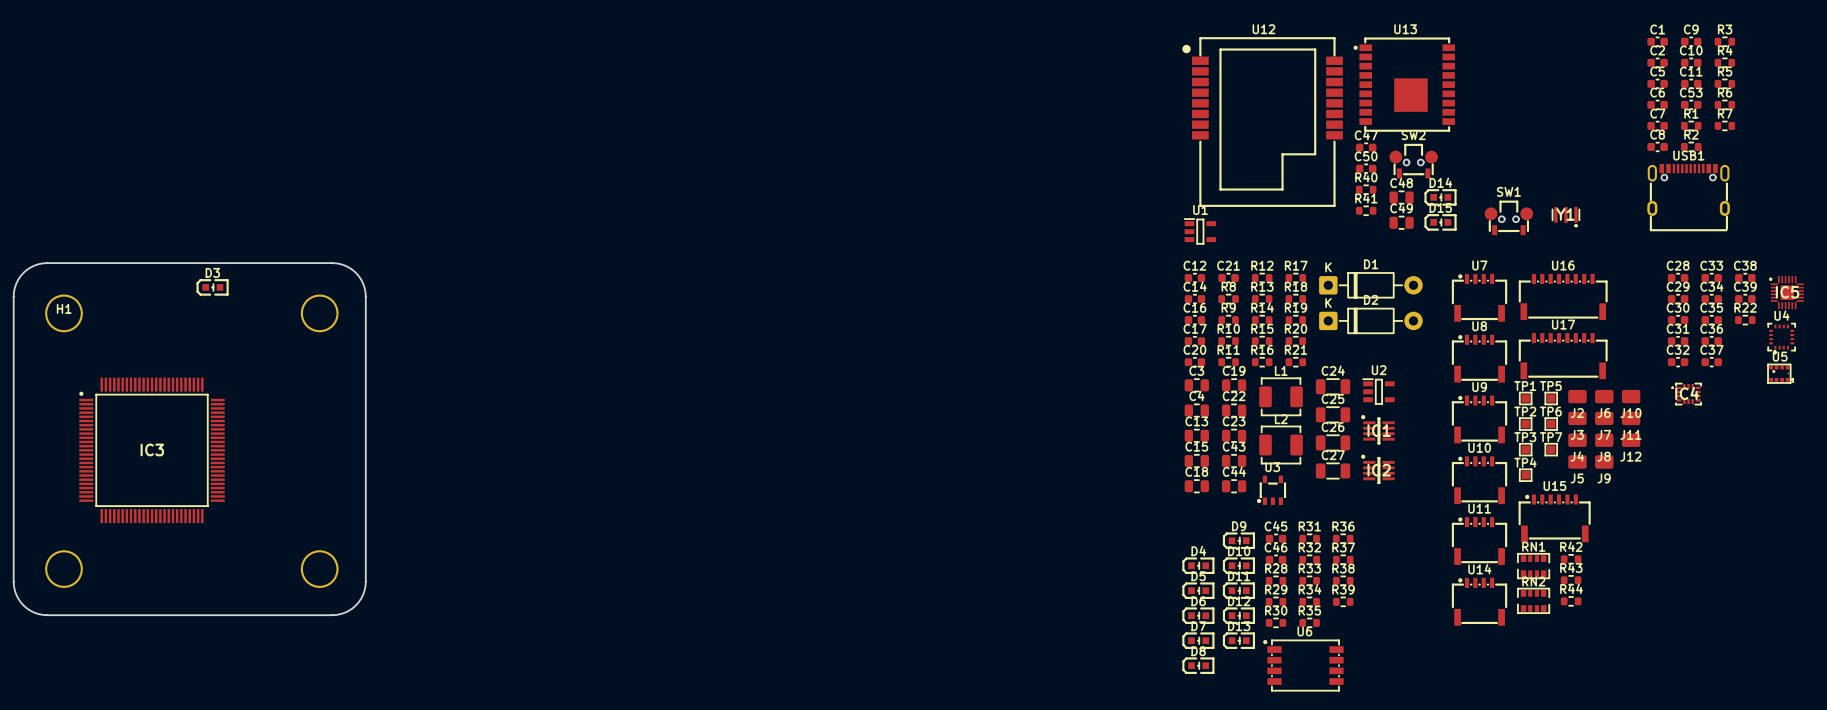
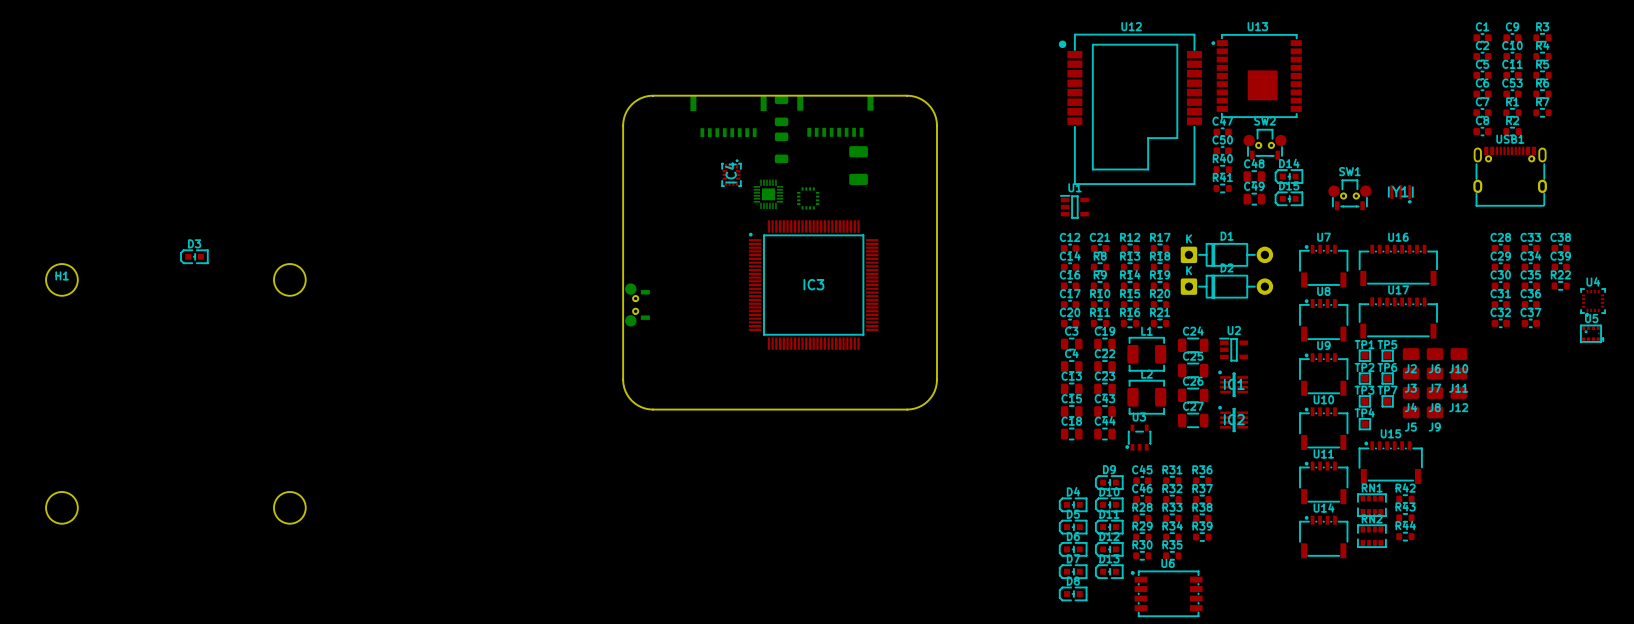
board edge: none -> (653, 95) (907, 95) (918, 97) (928, 104) (934, 114) (937, 125) (937, 379) (934, 391) (928, 400) (918, 407) (907, 409) (653, 409) (641, 407) (631, 400) (625, 391) (623, 379) (623, 121) (627, 110) (631, 104) (641, 97) (653, 95)
part: none -> (781, 110)
part: none -> (835, 116)
part: none -> (728, 116)
part: none -> (781, 147)
part: none -> (858, 165)
part: none -> (768, 194)
part: none -> (808, 198)
board edge: (47, 263) (332, 263) (345, 265) (355, 272) (363, 283) (365, 296) (365, 581) (363, 594) (355, 605) (345, 612) (332, 615) (47, 615) (34, 612) (23, 605) (16, 594) (13, 581) (13, 292) (18, 279) (26, 270) (38, 264) (47, 263) -> none
IC5: (1786, 292) -> none
part: none -> (637, 304)
IC4 rotation: 0° (1686, 394) -> 90° clockwise (731, 173)
IC4 position: (1686, 394) -> (731, 173)
IC3 position: (152, 450) -> (813, 285)

